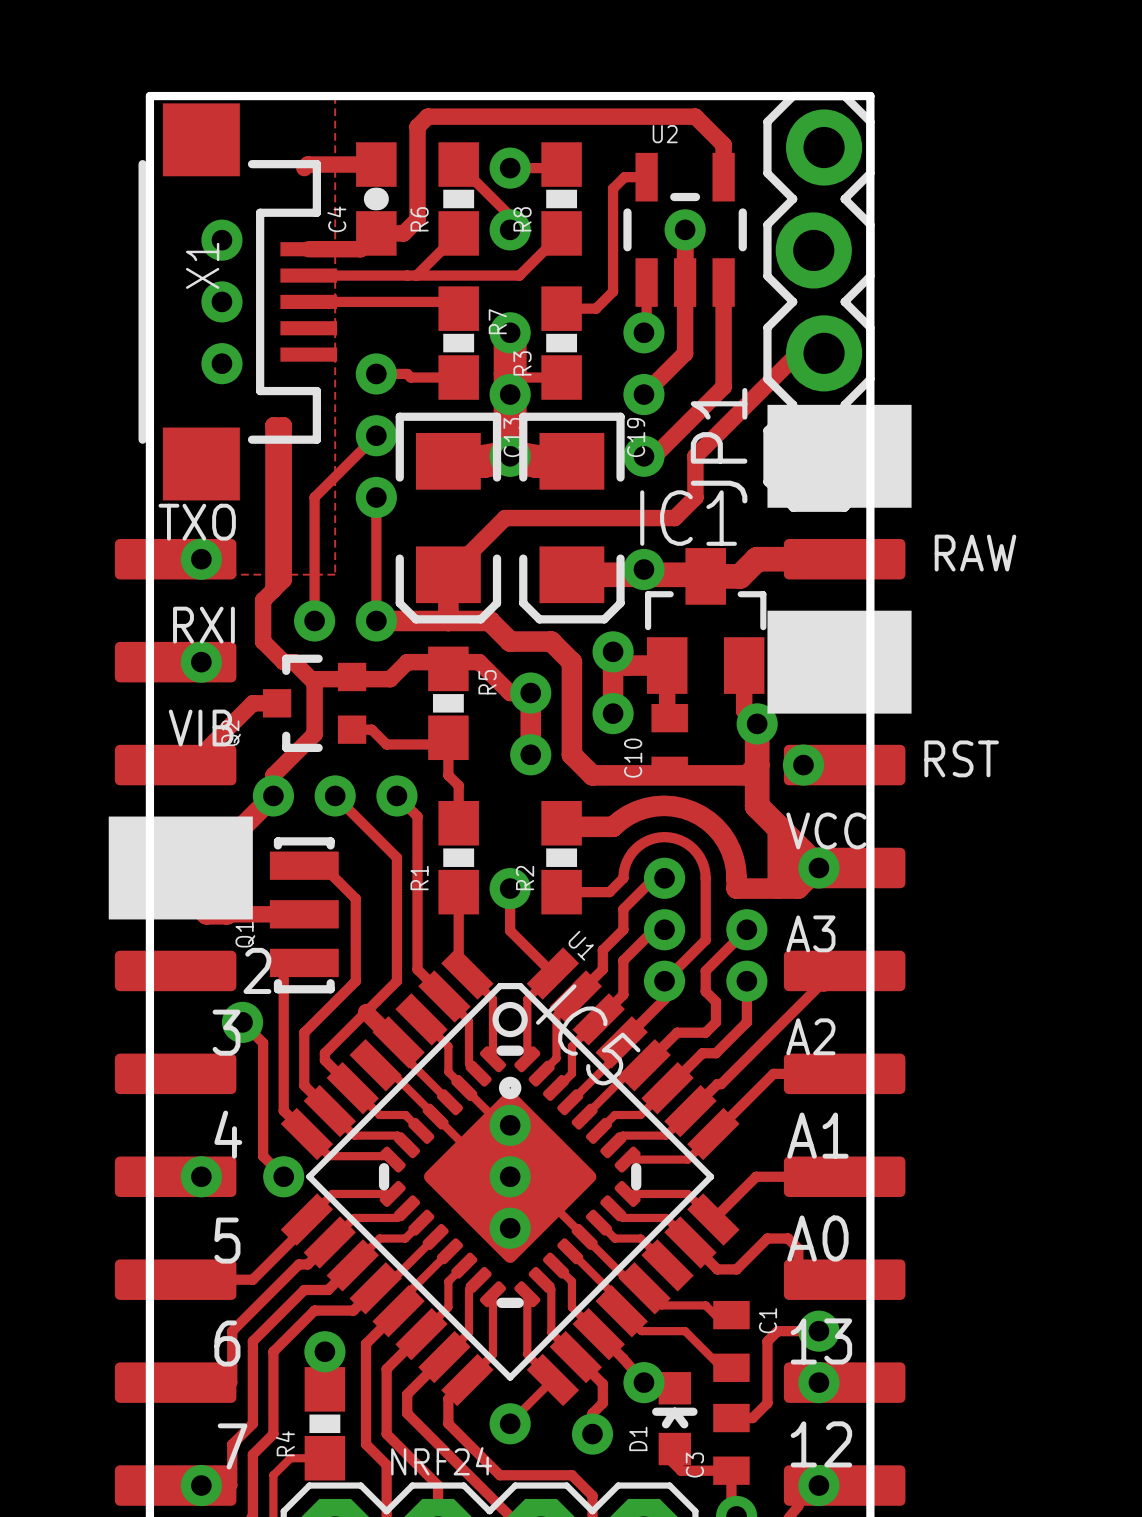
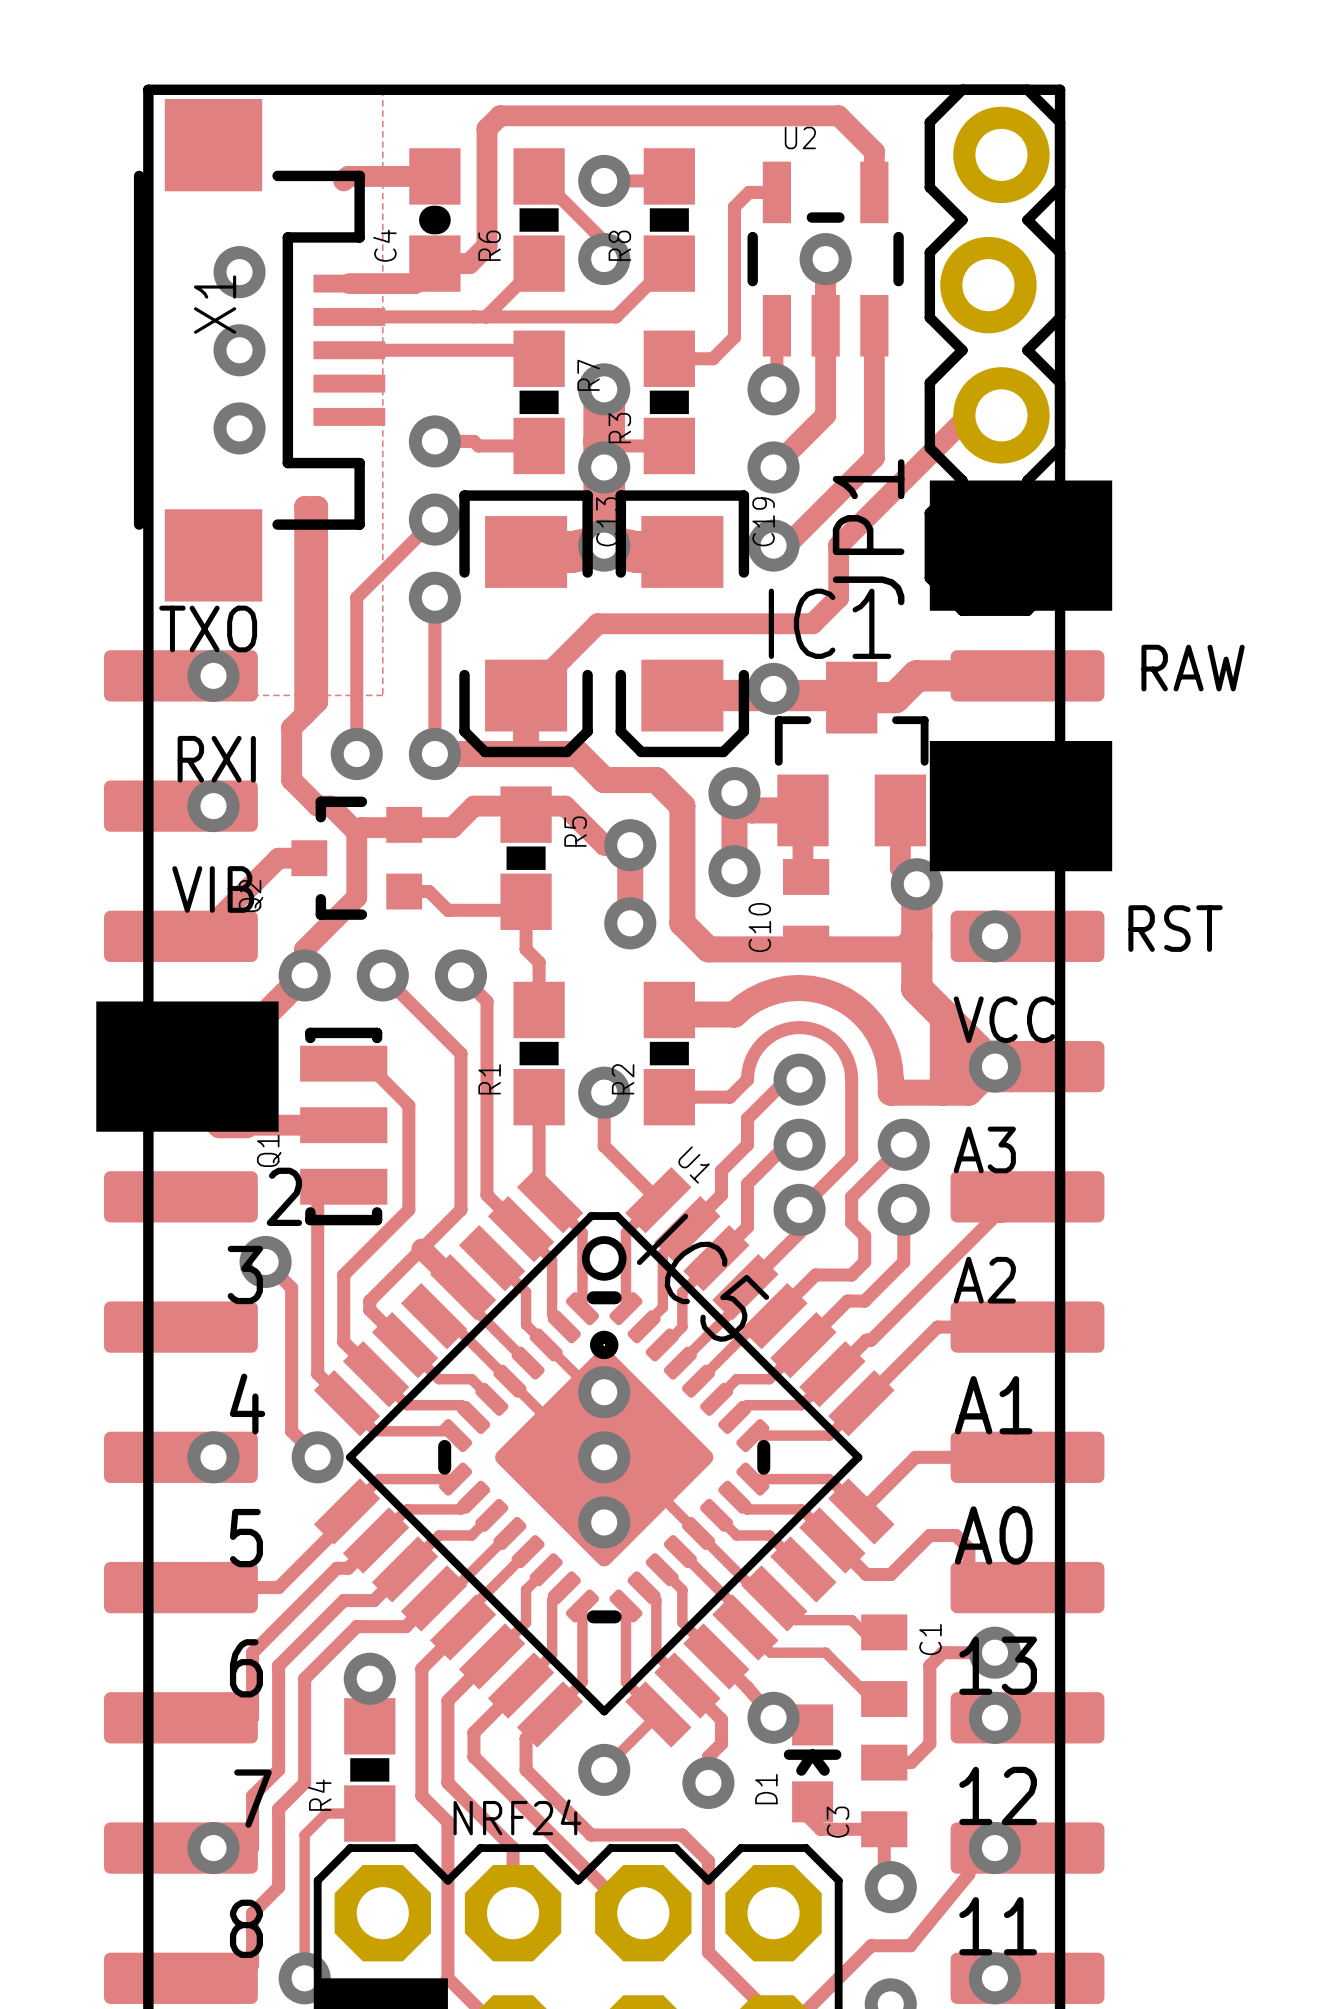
via position: (803, 765) -> (994, 936)

